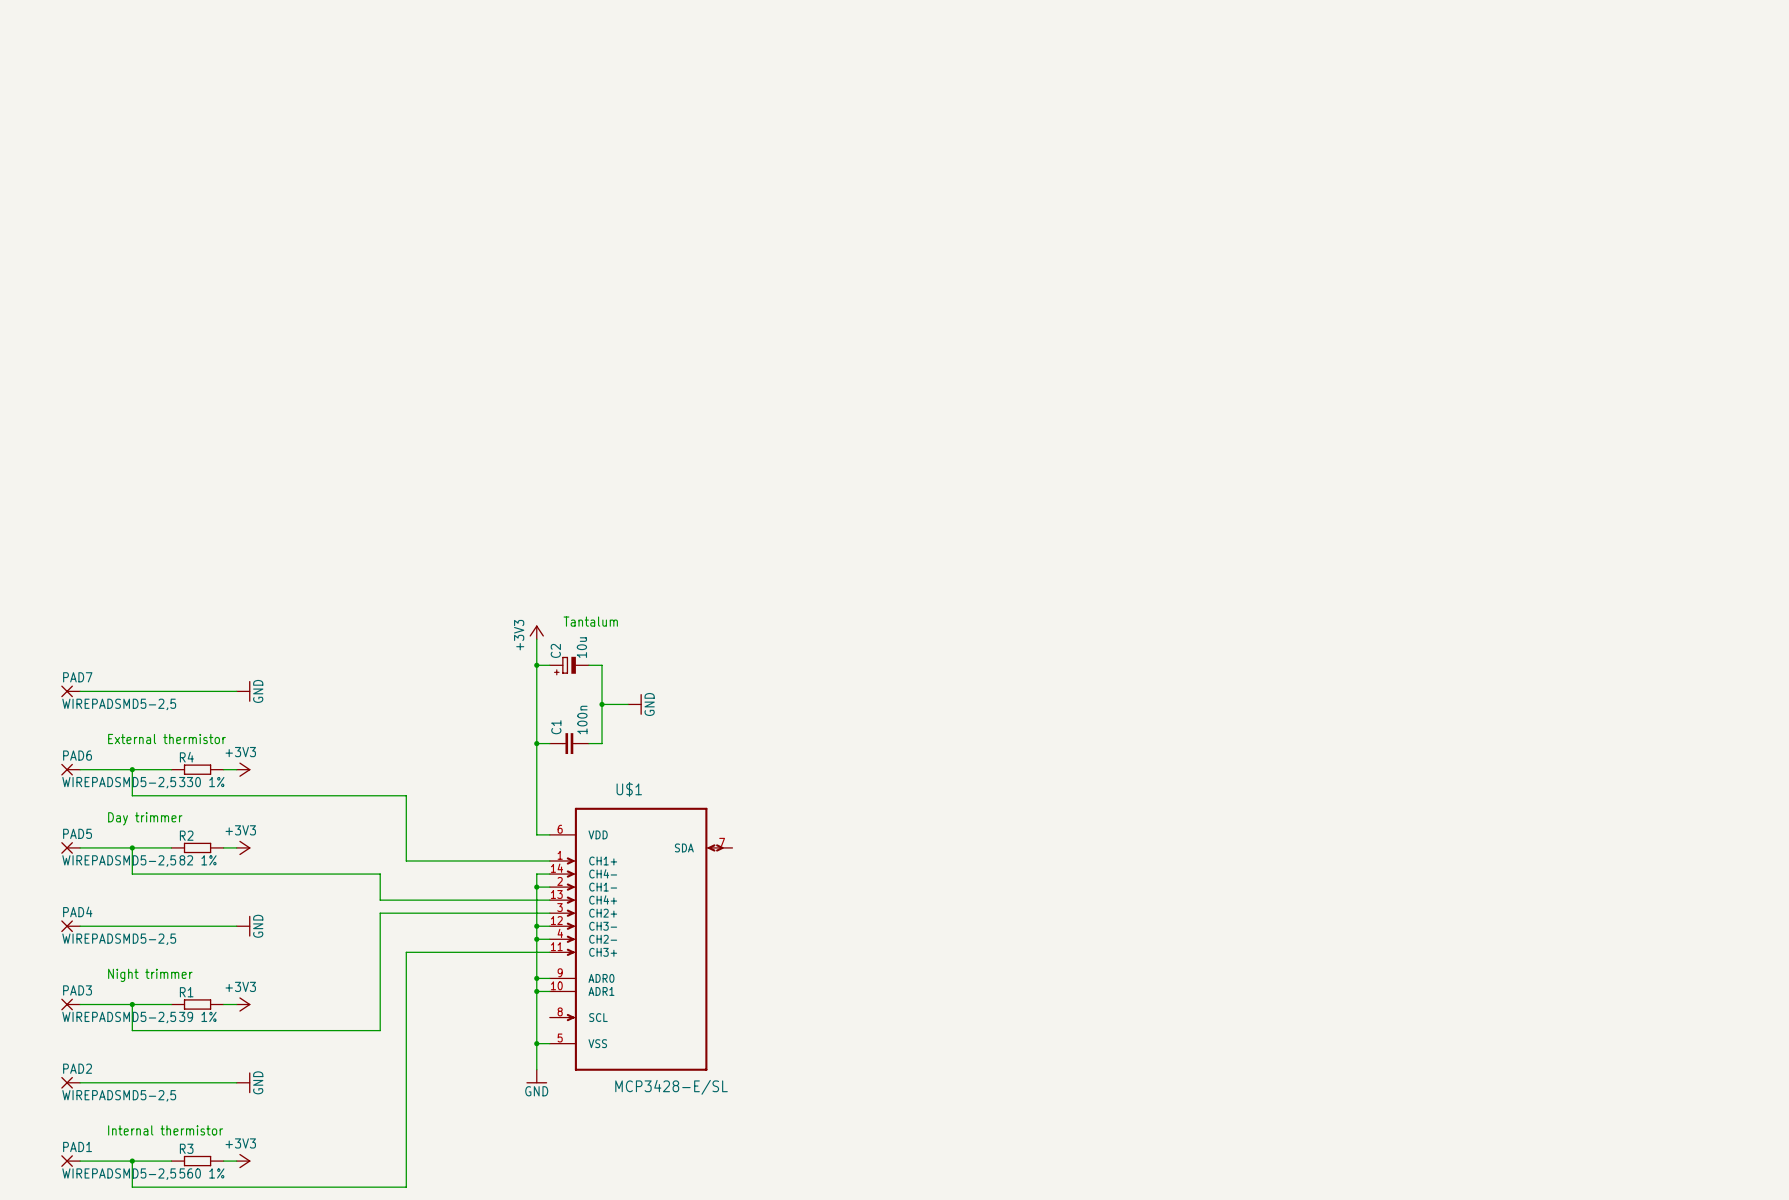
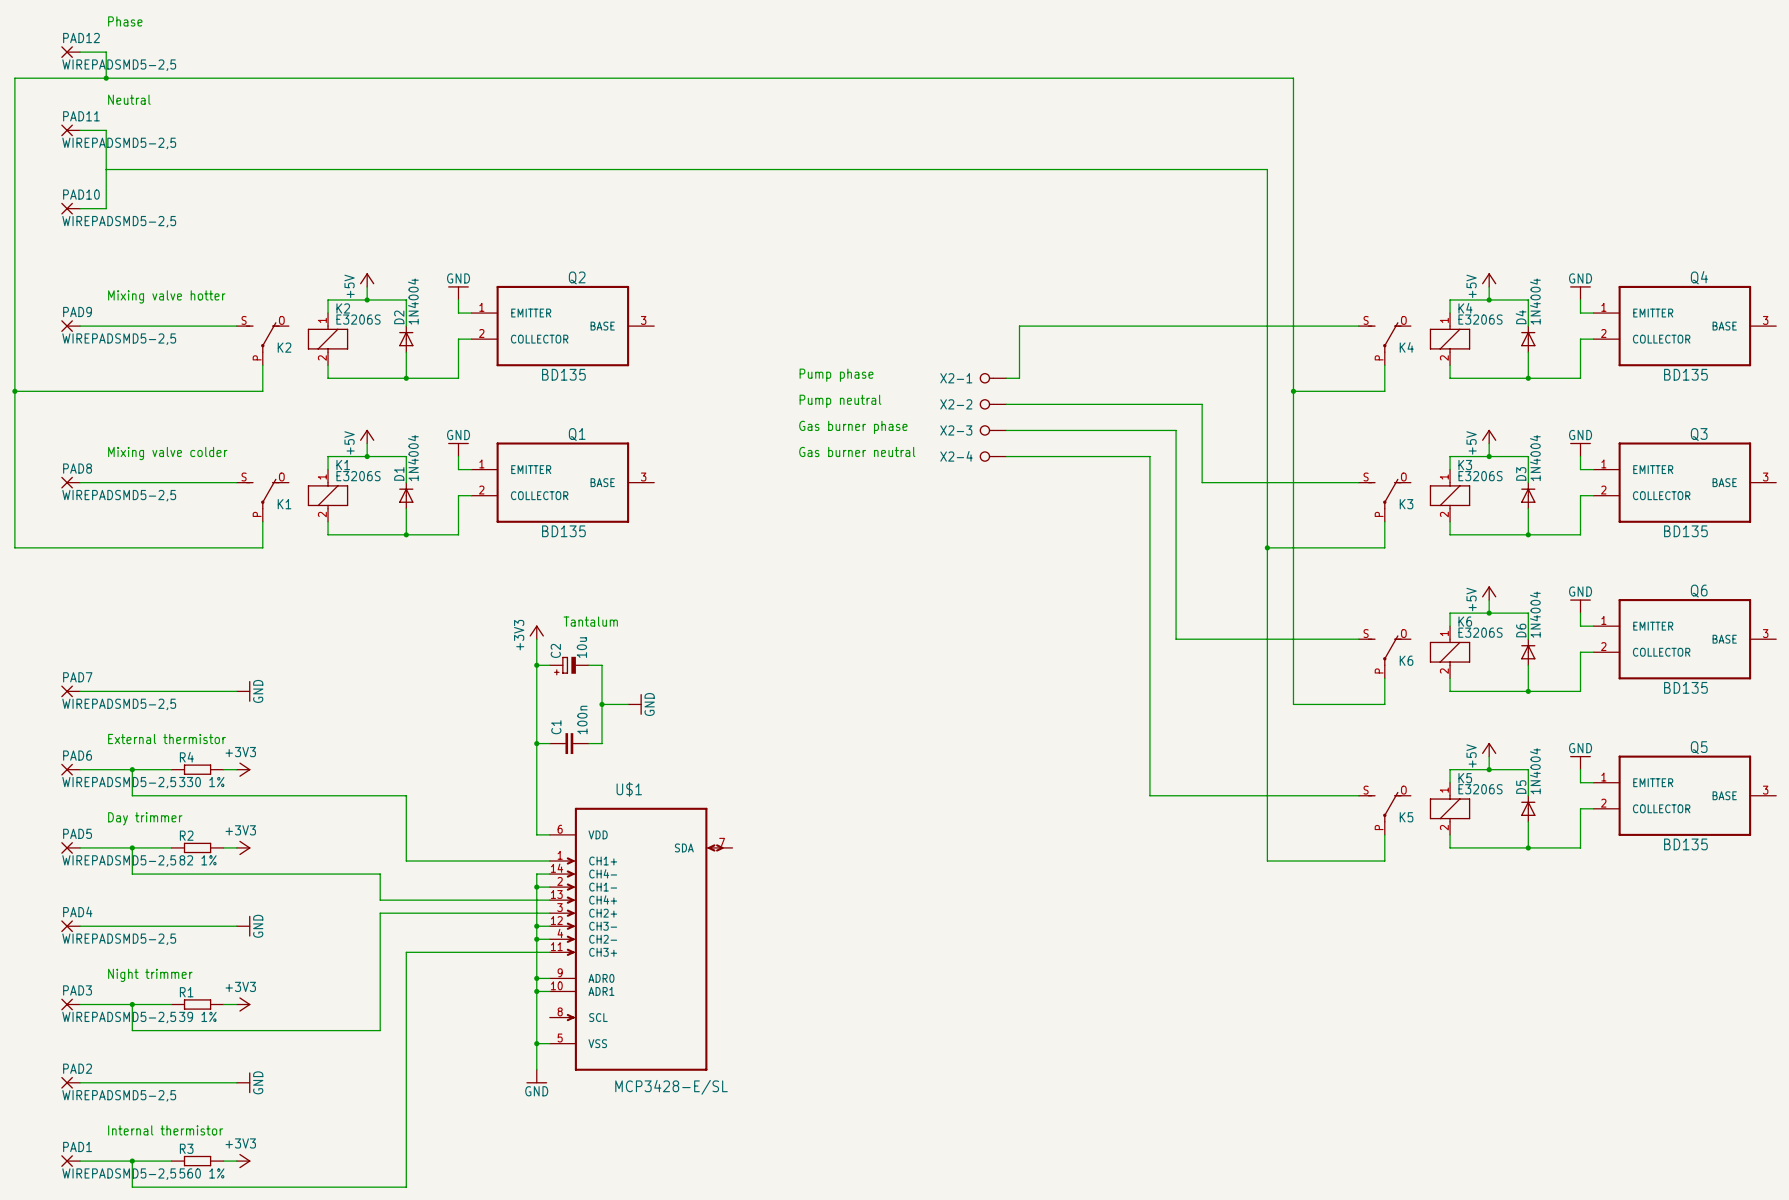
text: none -> Phase (125, 21)
PAD12: none -> WIREPADSMD5-2,5 (70, 52)
wire: none -> (80, 52) (106, 52) (106, 78)
junction: none -> (106, 78)
text: none -> Neutral (129, 99)
PAD11: none -> WIREPADSMD5-2,5 (70, 130)
wire: none -> (80, 130) (106, 130) (106, 208) (80, 208)
wire: none -> (106, 169) (1267, 169) (1267, 860) (1384, 860) (1384, 834)
PAD10: none -> WIREPADSMD5-2,5 (70, 208)
power symbol: none -> +5V (367, 280)
power symbol: none -> +5V (1489, 280)
wire: none -> (367, 286) (367, 299)
wire: none -> (1489, 286) (1489, 299)
power symbol: none -> GND (458, 293)
power symbol: none -> GND (1580, 293)
text: none -> Mixing valve hotter (166, 296)
junction: none -> (367, 299)
wire: none -> (458, 299) (458, 313) (471, 313)
junction: none -> (1489, 299)
wire: none -> (1580, 299) (1580, 313) (1593, 313)
wire: none -> (328, 313) (328, 299) (406, 299) (406, 326)
wire: none -> (1450, 313) (1450, 299) (1528, 299) (1528, 326)
PAD9: none -> WIREPADSMD5-2,5 (70, 326)
wire: none -> (80, 326) (236, 326)
Q2: none -> BD135 (562, 326)
wire: none -> (1358, 326) (1019, 326) (1019, 378) (1006, 378)
Q4: none -> BD135 (1684, 326)
K2: none -> E3206S (328, 339)
D2: none -> 1N4004 (406, 339)
wire: none -> (471, 339) (458, 339) (458, 378) (328, 378) (328, 365)
K4: none -> E3206S (1450, 339)
D4: none -> 1N4004 (1528, 339)
wire: none -> (1593, 339) (1580, 339) (1580, 378) (1450, 378) (1450, 365)
K2: none -> (262, 343)
K4: none -> (1384, 343)
wire: none -> (406, 352) (406, 378)
wire: none -> (1528, 352) (1528, 378)
wire: none -> (262, 365) (262, 391) (14, 391)
wire: none -> (1384, 365) (1384, 391) (1293, 391)
text: none -> Pump phase (836, 375)
junction: none -> (406, 378)
X2-1: none -> (993, 378)
junction: none -> (1528, 378)
junction: none -> (14, 391)
junction: none -> (1293, 391)
text: none -> Pump neutral (840, 401)
X2-2: none -> (993, 404)
wire: none -> (1006, 404) (1202, 404) (1202, 482) (1358, 482)
text: none -> Gas burner phase (853, 427)
X2-3: none -> (993, 430)
wire: none -> (1006, 430) (1176, 430) (1176, 639) (1358, 639)
power symbol: none -> +5V (367, 436)
power symbol: none -> +5V (1489, 436)
wire: none -> (367, 443) (367, 456)
wire: none -> (1489, 443) (1489, 456)
power symbol: none -> GND (458, 449)
power symbol: none -> GND (1580, 449)
text: none -> Gas burner neutral (857, 451)
text: none -> Mixing valve colder (167, 453)
junction: none -> (367, 456)
wire: none -> (458, 456) (458, 469) (471, 469)
X2-4: none -> (993, 456)
wire: none -> (1006, 456) (1149, 456) (1149, 795) (1358, 795)
junction: none -> (1489, 456)
wire: none -> (1580, 456) (1580, 469) (1593, 469)
wire: none -> (328, 469) (328, 456) (406, 456) (406, 482)
wire: none -> (1450, 469) (1450, 456) (1528, 456) (1528, 482)
PAD8: none -> WIREPADSMD5-2,5 (70, 482)
wire: none -> (80, 482) (236, 482)
Q1: none -> BD135 (562, 482)
Q3: none -> BD135 (1684, 482)
K1: none -> E3206S (328, 495)
D1: none -> 1N4004 (406, 495)
wire: none -> (471, 495) (458, 495) (458, 534) (328, 534) (328, 521)
K3: none -> E3206S (1450, 495)
D3: none -> 1N4004 (1528, 495)
wire: none -> (1593, 495) (1580, 495) (1580, 534) (1450, 534) (1450, 521)
K1: none -> (262, 500)
K3: none -> (1384, 500)
wire: none -> (406, 508) (406, 534)
wire: none -> (1528, 508) (1528, 534)
wire: none -> (262, 521) (262, 547) (14, 547) (14, 78) (1293, 78) (1293, 704) (1384, 704) (1384, 678)
wire: none -> (1384, 521) (1384, 547) (1267, 547)
junction: none -> (406, 534)
junction: none -> (1528, 534)
junction: none -> (1267, 547)
power symbol: none -> +5V (1489, 593)
wire: none -> (1489, 600) (1489, 613)
power symbol: none -> GND (1580, 606)
junction: none -> (1489, 613)
wire: none -> (1580, 613) (1580, 626) (1593, 626)
wire: none -> (1450, 626) (1450, 613) (1528, 613) (1528, 639)
Q6: none -> BD135 (1684, 639)
K6: none -> E3206S (1450, 652)
D6: none -> 1N4004 (1528, 652)
wire: none -> (1593, 652) (1580, 652) (1580, 691) (1450, 691) (1450, 678)
K6: none -> (1384, 656)
wire: none -> (1528, 665) (1528, 691)
junction: none -> (1528, 691)
power symbol: none -> +5V (1489, 749)
wire: none -> (1489, 756) (1489, 769)
power symbol: none -> GND (1580, 762)
junction: none -> (1489, 769)
wire: none -> (1580, 769) (1580, 782) (1593, 782)
wire: none -> (1450, 782) (1450, 769) (1528, 769) (1528, 795)
Q5: none -> BD135 (1684, 795)
K5: none -> E3206S (1450, 808)
D5: none -> 1N4004 (1528, 808)
wire: none -> (1593, 808) (1580, 808) (1580, 847) (1450, 847) (1450, 834)
K5: none -> (1384, 813)
wire: none -> (1528, 821) (1528, 847)
junction: none -> (1528, 847)

